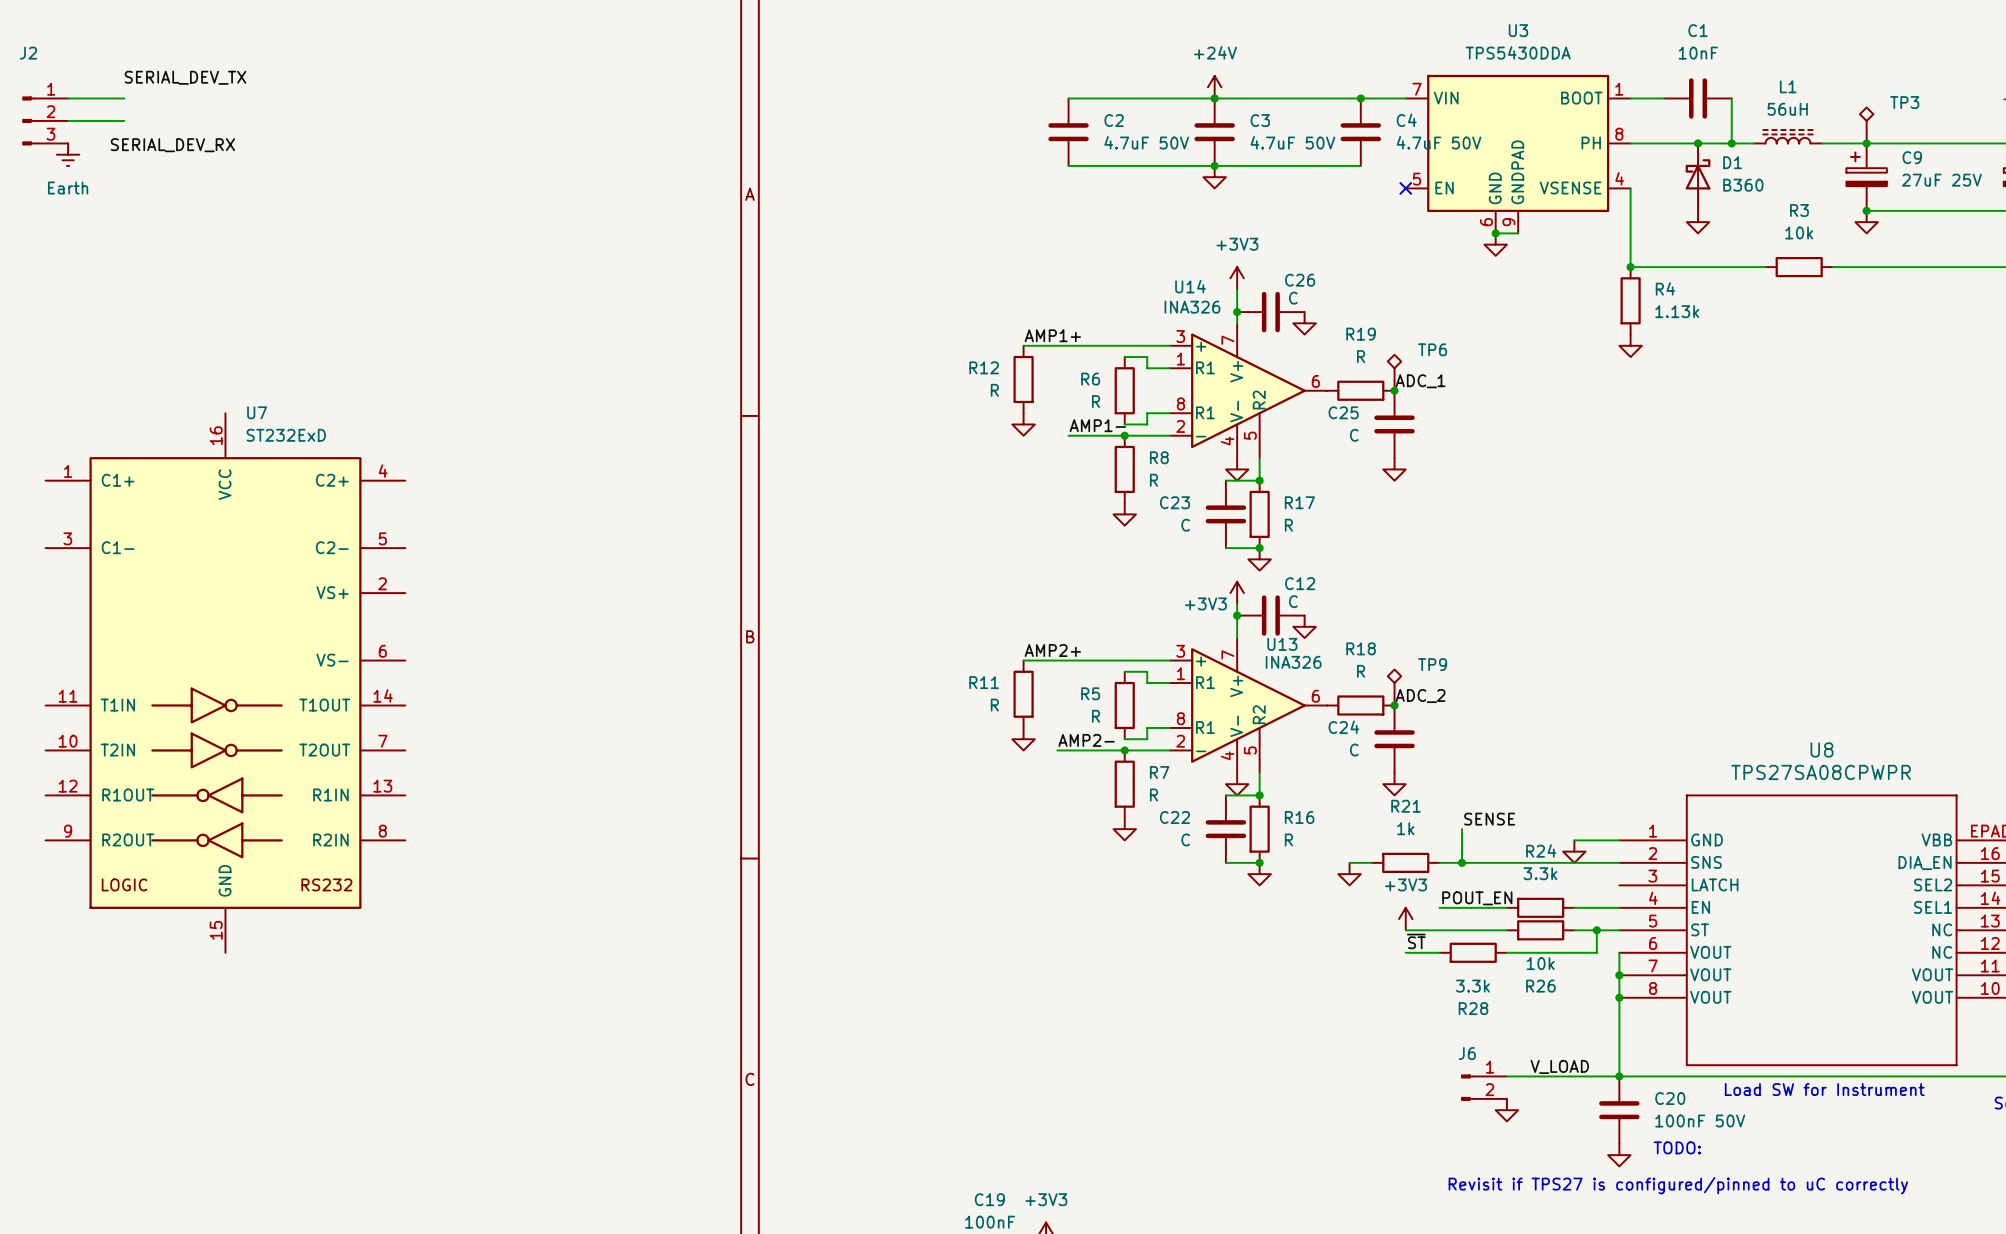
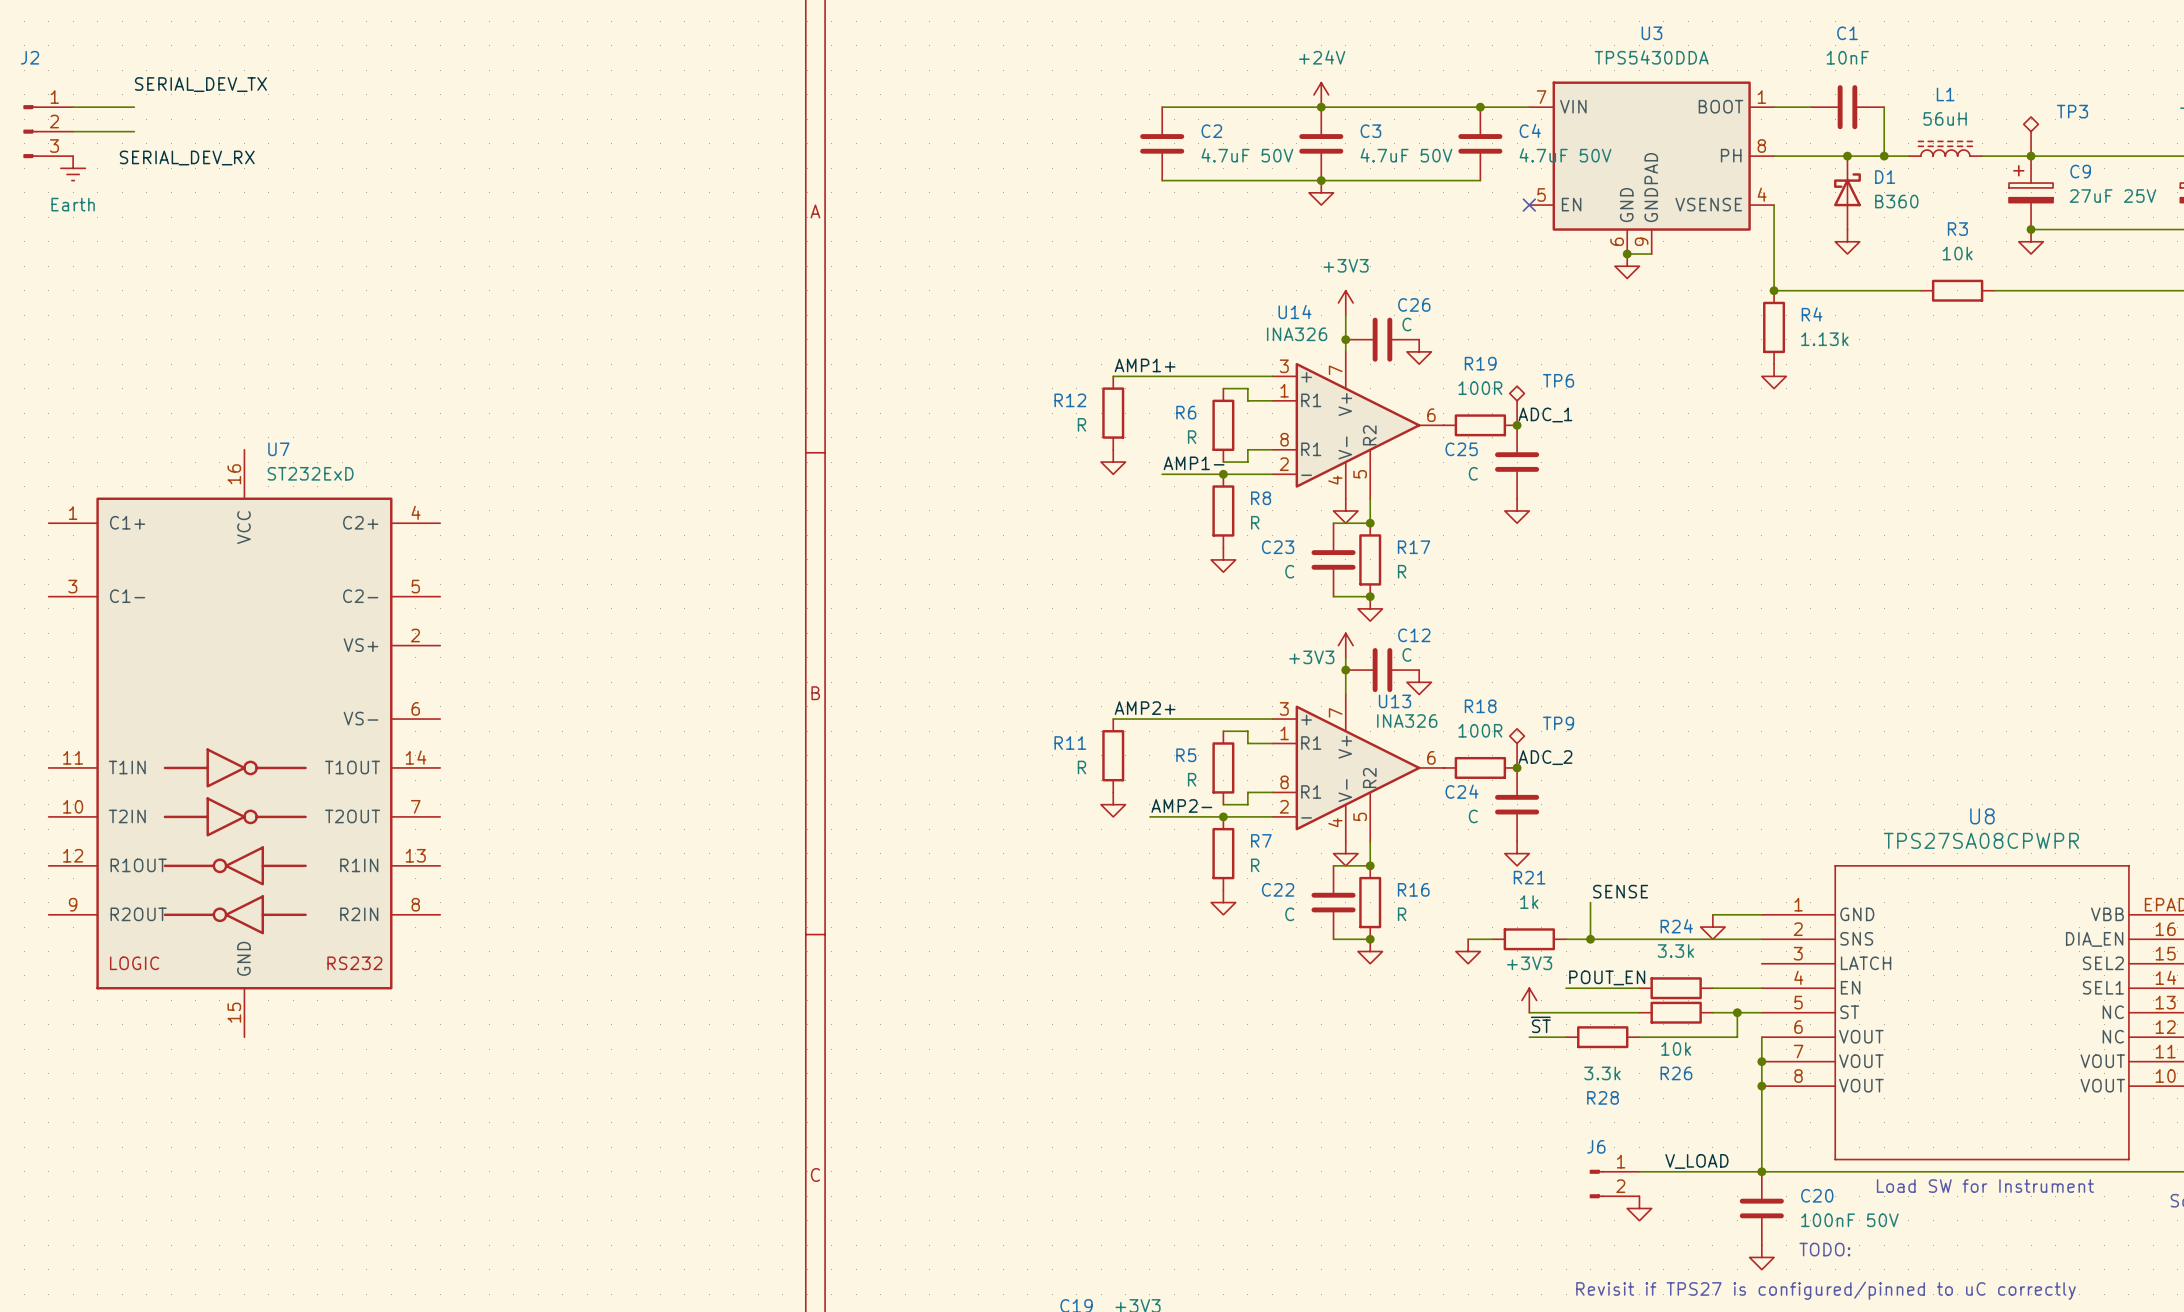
R19 value: R (1361, 356) -> 100R (1480, 388)
R18 value: R (1361, 671) -> 100R (1480, 730)

